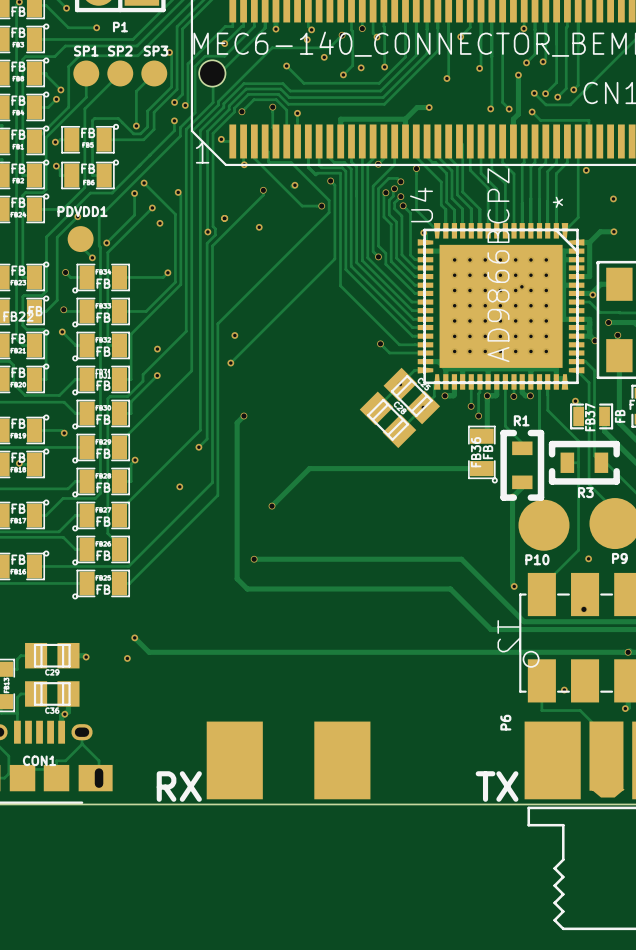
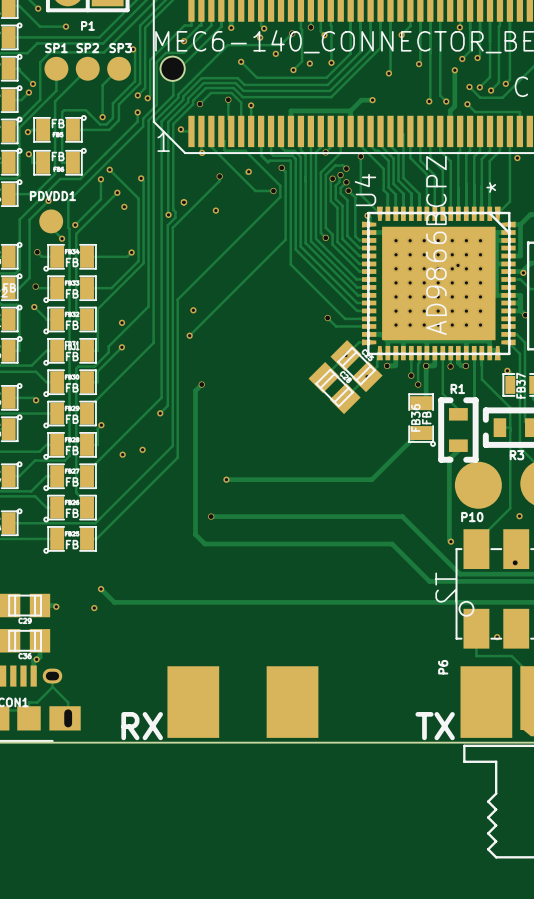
track: (479, 468) (309, 468) (272, 506) -> (418, 433) (371, 479) (226, 479)
via: none -> (122, 454)
via: (272, 506) -> none
via: none -> (226, 479)

